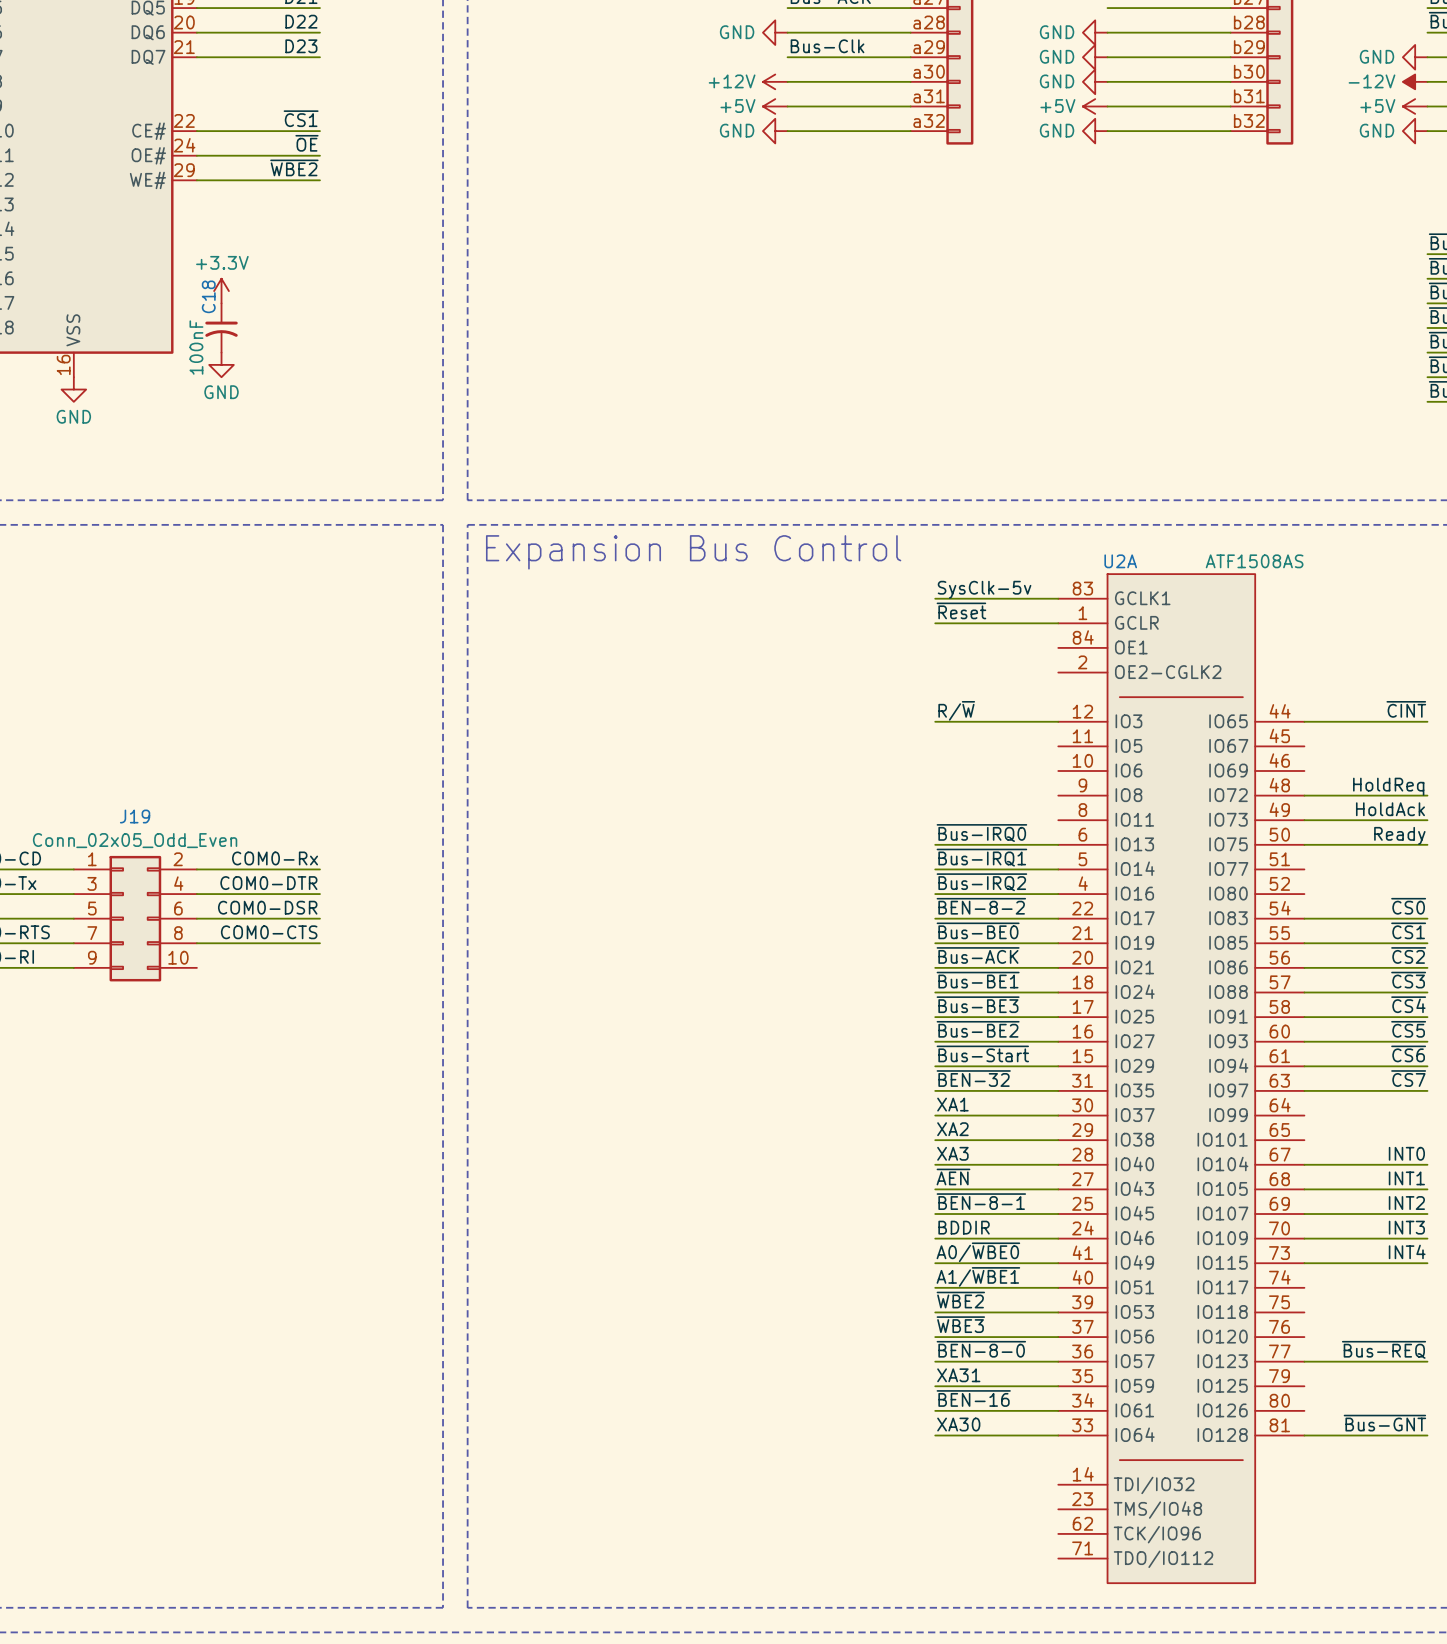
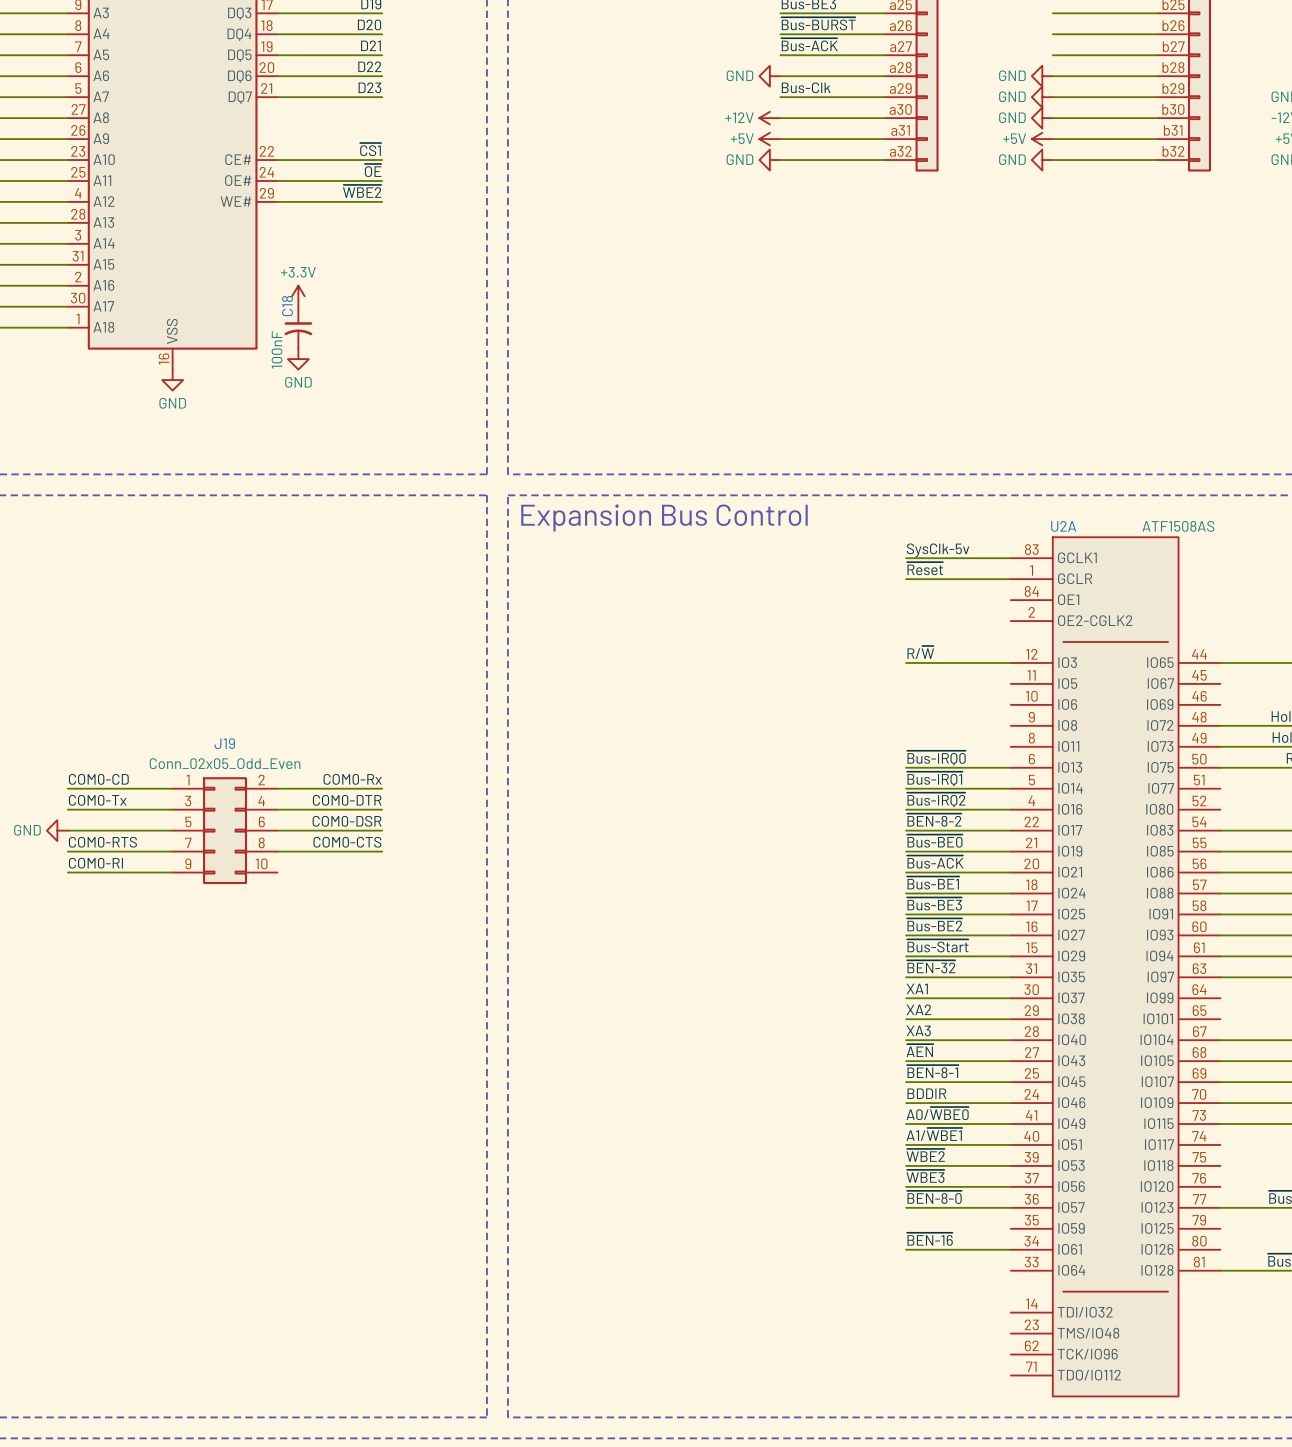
label: XA31 (958, 1375) -> none
wire: (935, 1386) (1058, 1386) -> none
label: XA30 (958, 1424) -> none
wire: (935, 1435) (1058, 1435) -> none

